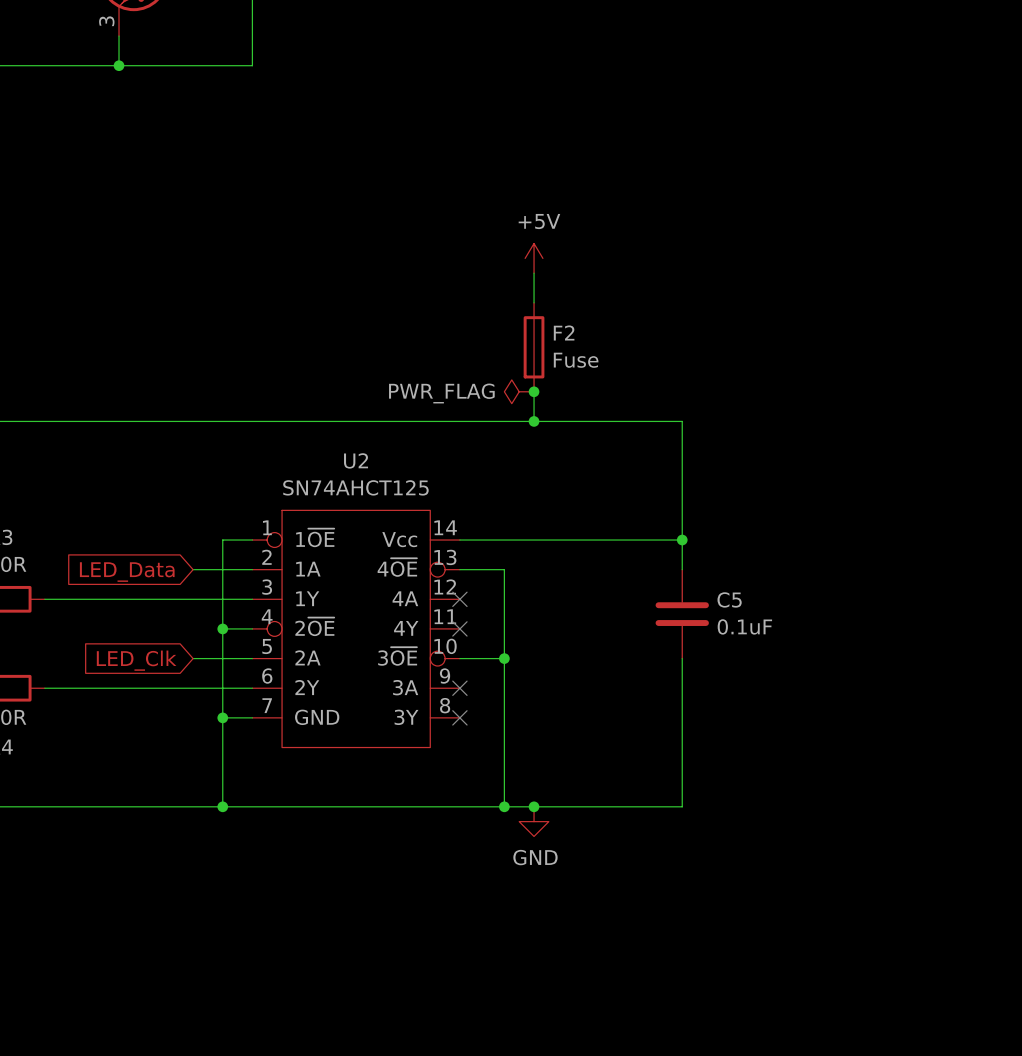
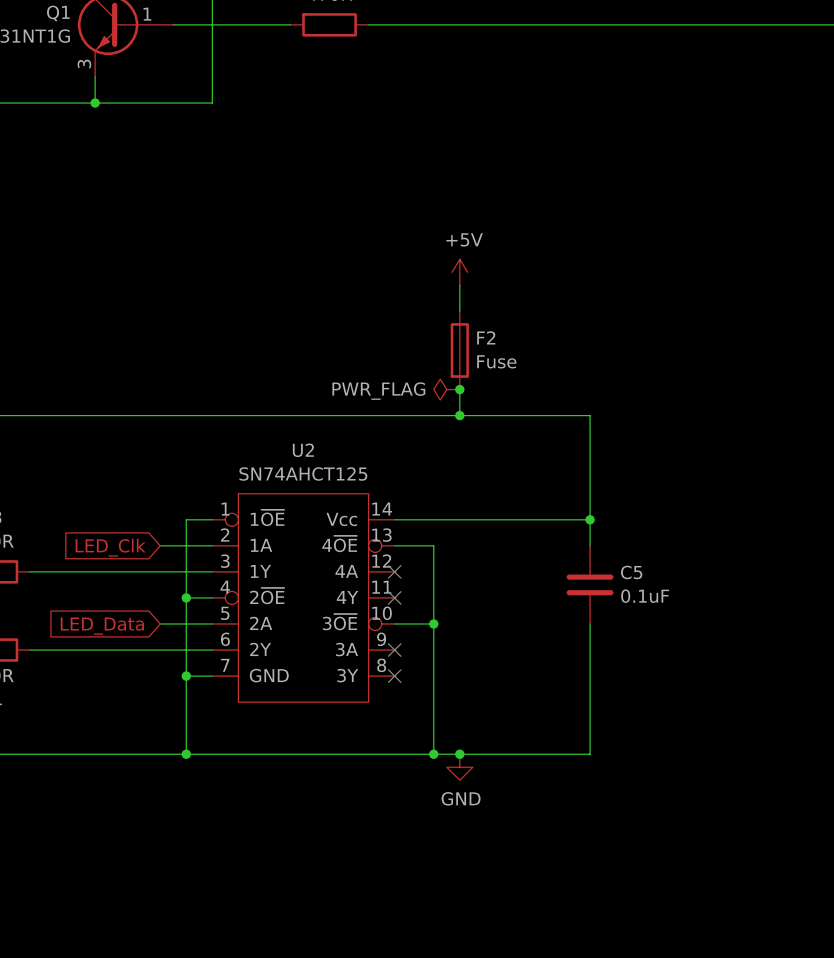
global label: LED_Data (127, 572) -> LED_Clk (110, 547)
global label: LED_Clk (136, 660) -> LED_Data (102, 626)

